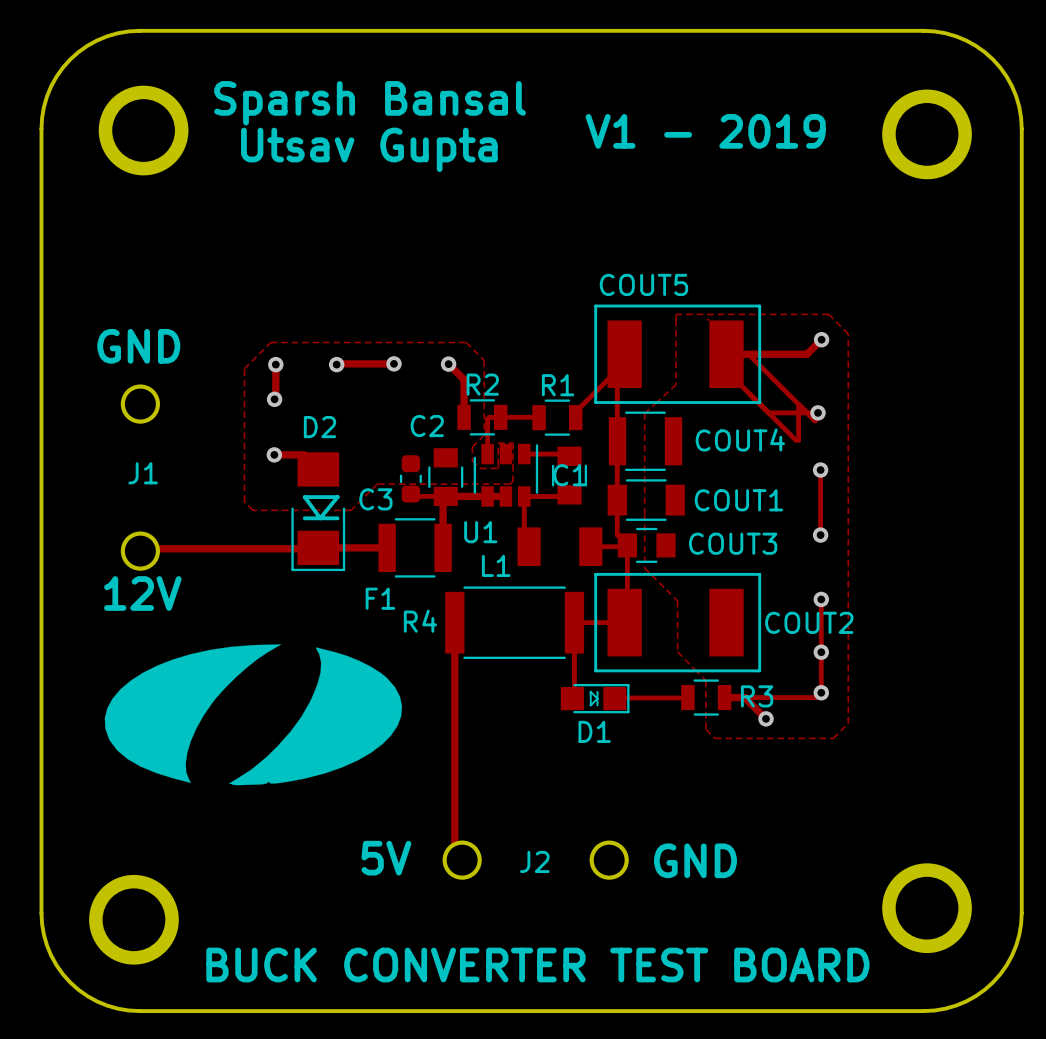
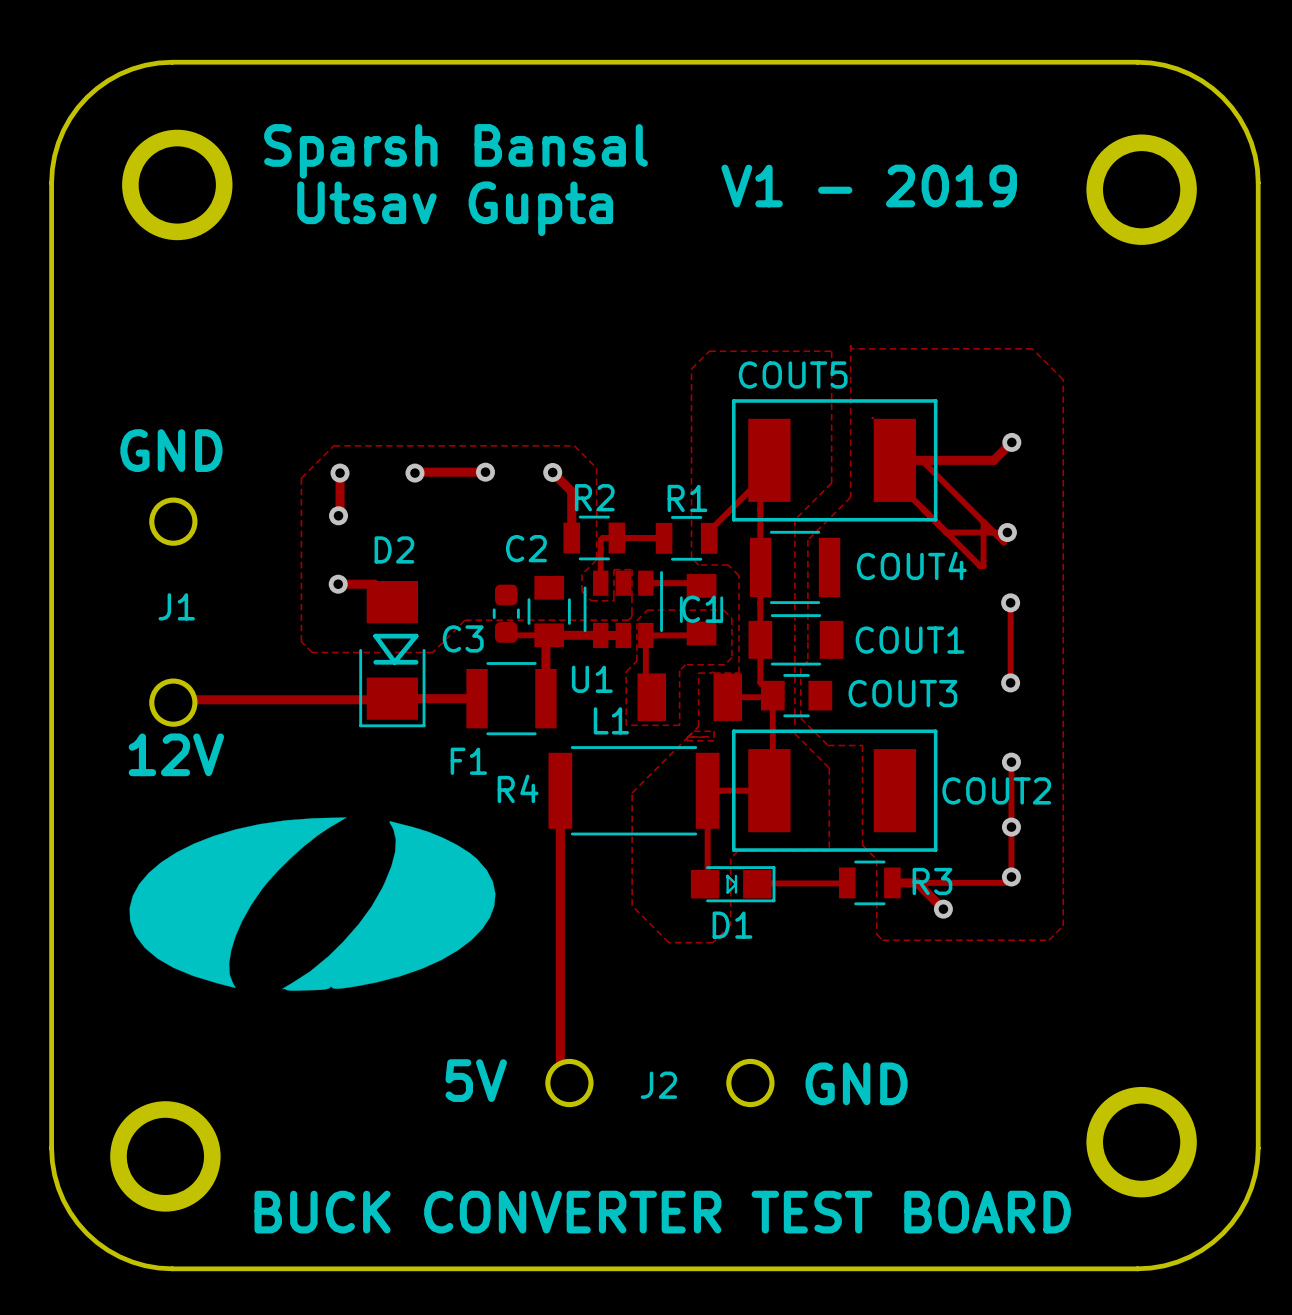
zone outline: none -> (850, 345) (850, 497) (807, 540) (807, 661) (800, 668) (800, 718) (828, 745) (862, 745) (862, 845) (876, 859) (876, 934) (882, 940) (1048, 940) (1063, 926) (1063, 379) (1032, 348) (850, 348)
zone outline: none -> (709, 351) (691, 369) (691, 557) (698, 564) (728, 564) (739, 575) (739, 673) (698, 673) (698, 726) (632, 793) (632, 905) (668, 942) (712, 942) (730, 924) (730, 858) (737, 851) (829, 851) (829, 768) (794, 733) (794, 519) (831, 483) (831, 351) (709, 351)
zone outline: (676, 319) (676, 314) (828, 314) (848, 333) (848, 723) (833, 738) (714, 738) (705, 729) (705, 680) (677, 651) (677, 600) (644, 568) (644, 413) (676, 384) (676, 319) -> none
zone outline: none -> (647, 610) (636, 620) (636, 661) (626, 671) (626, 725) (679, 725) (679, 670) (685, 664) (724, 664) (731, 657) (731, 618) (723, 610) (647, 610)
zone outline: none -> (693, 731) (714, 731) (714, 740) (686, 740) (686, 738)
zone outline: none -> (708, 736) (708, 737) (687, 737) (708, 736)

